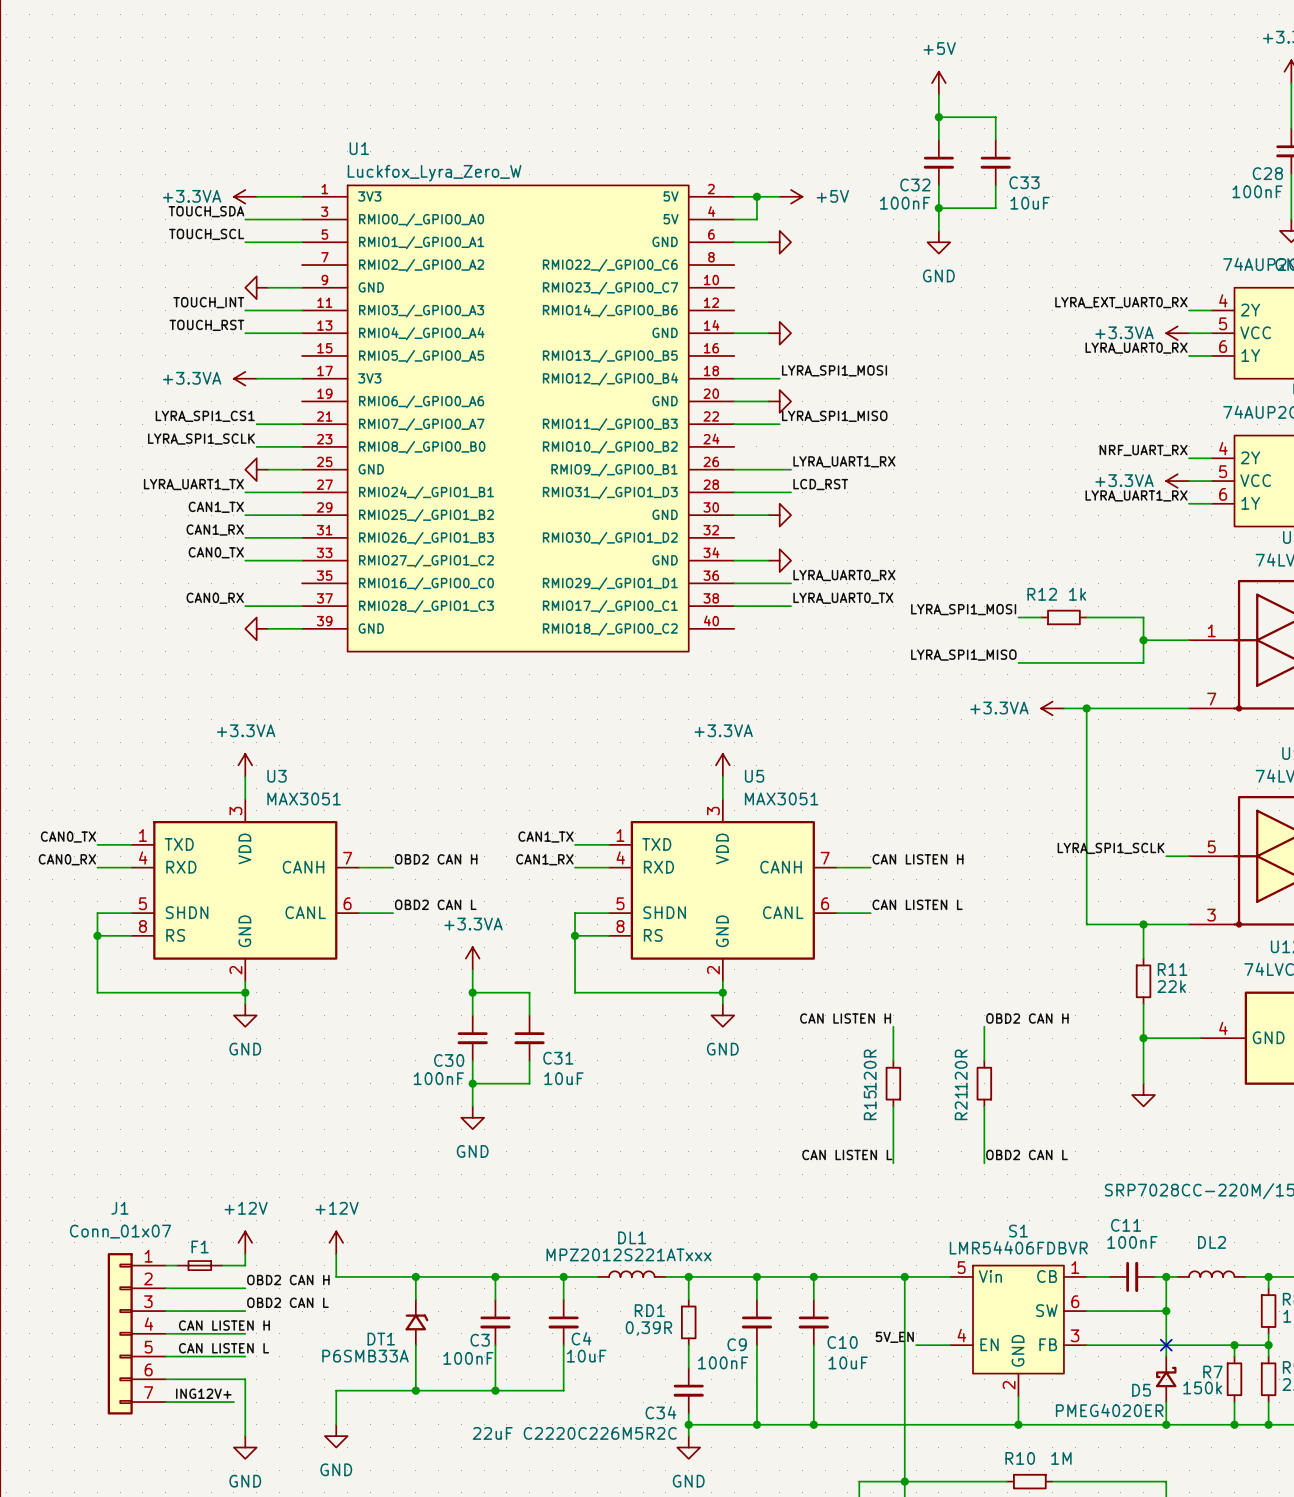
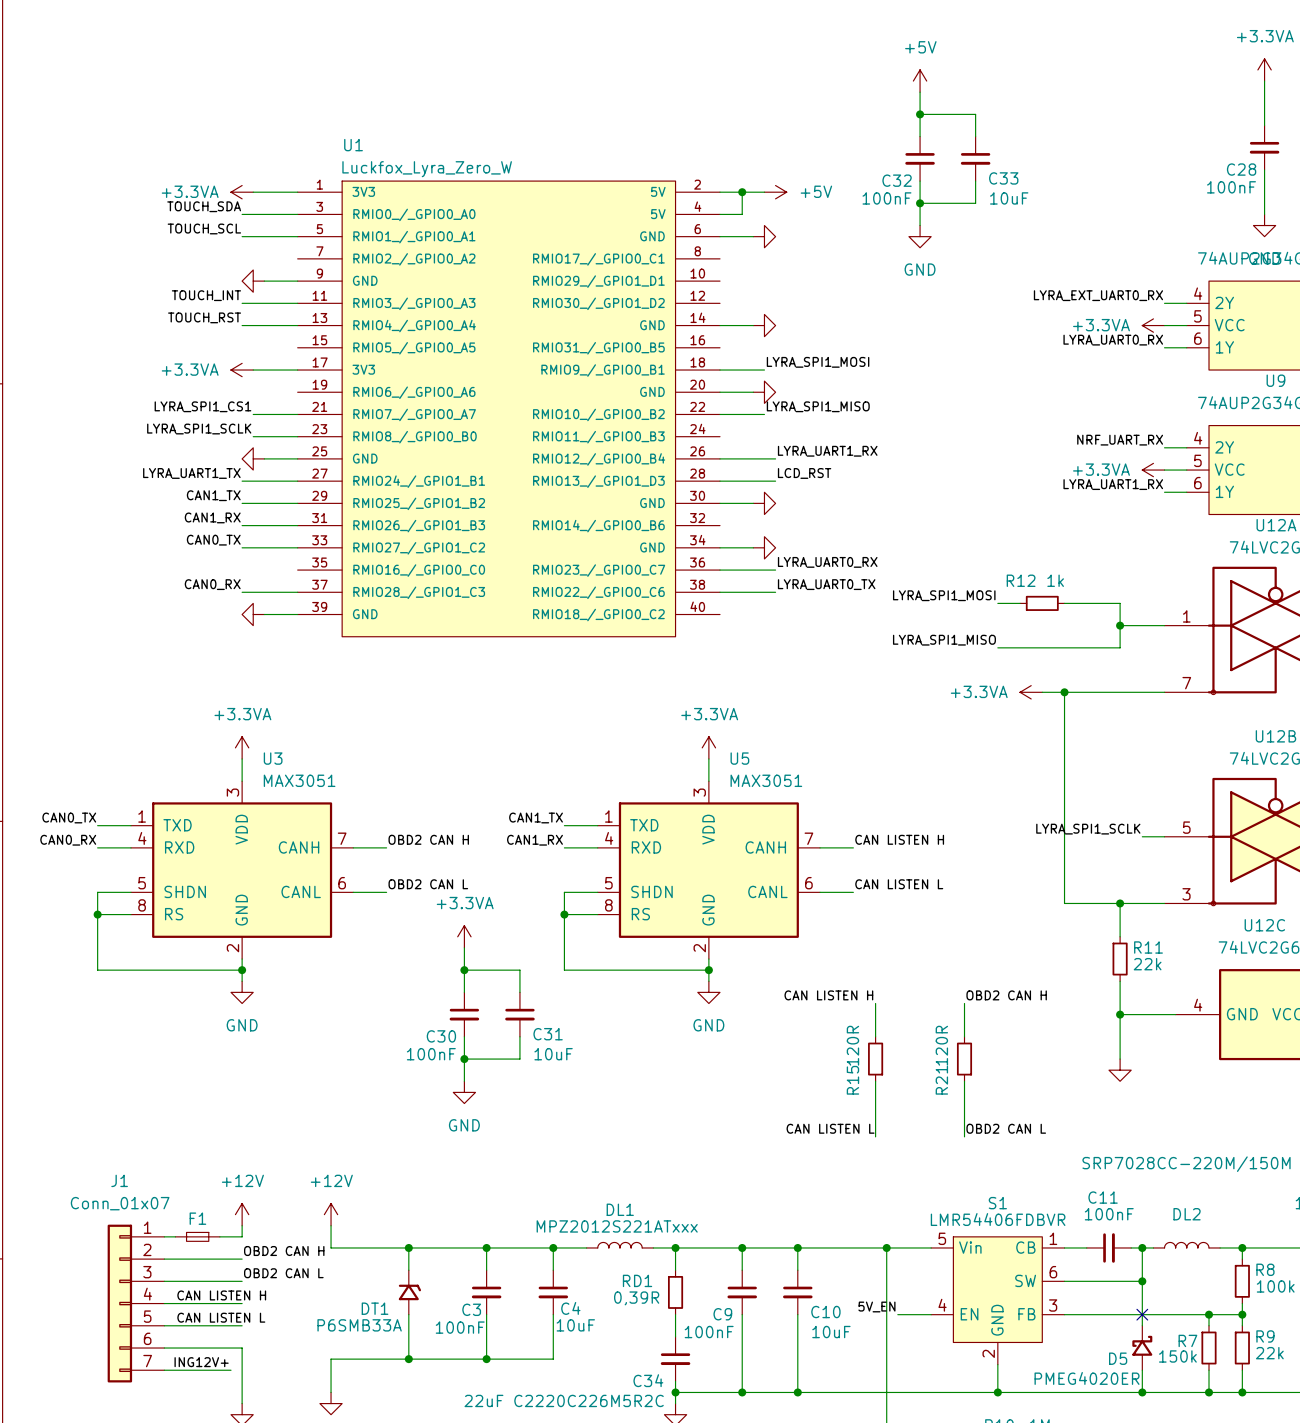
U1 symbol: [302, 185, 735, 652] -> [297, 181, 721, 637]

